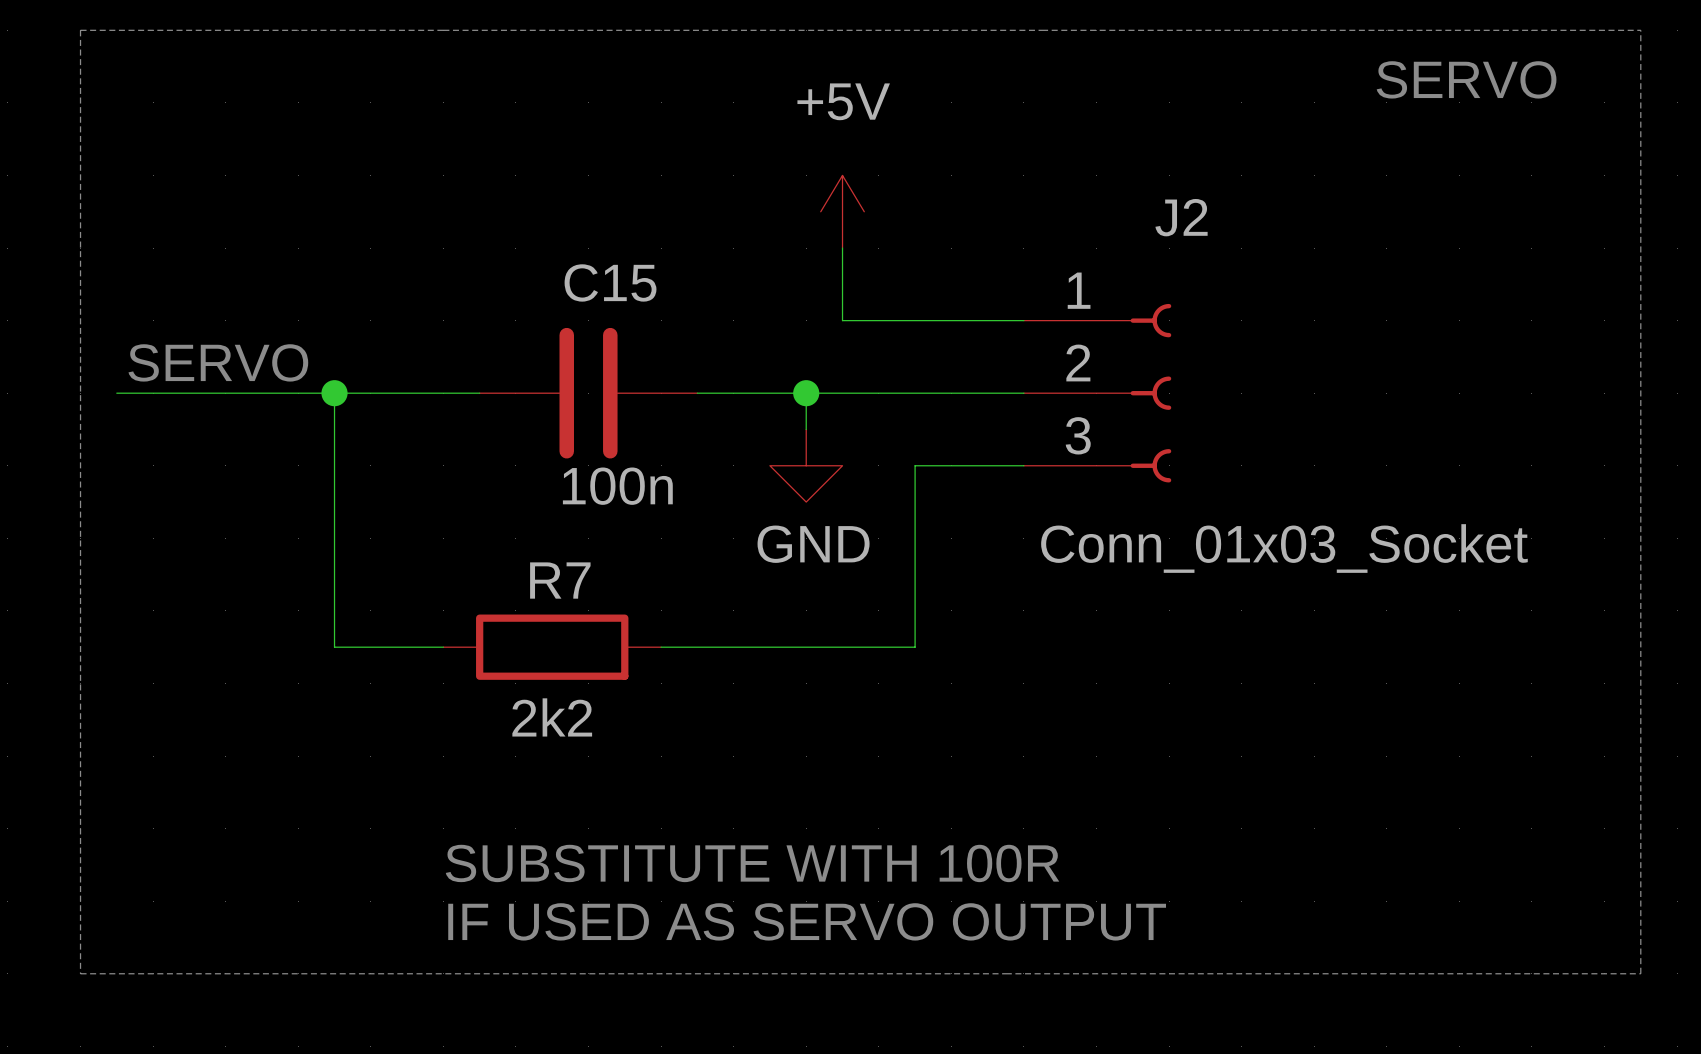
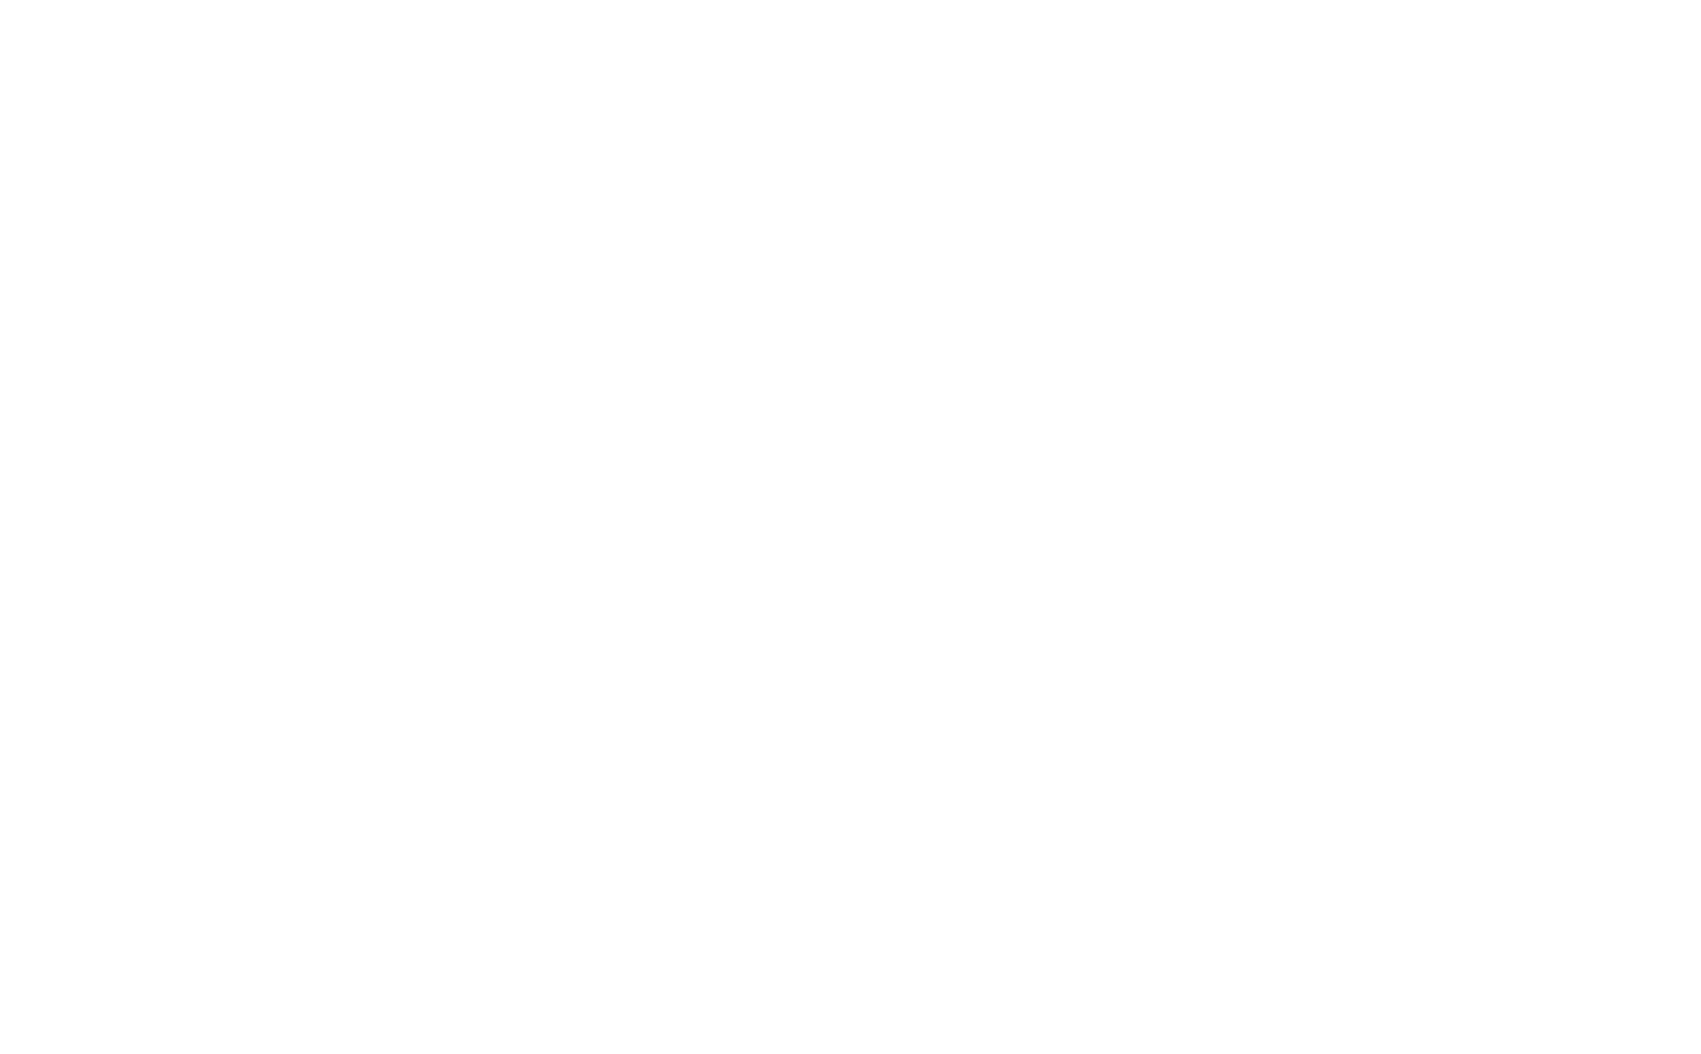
line: (80, 30) (1640, 30) (1640, 973) (80, 973) (80, 30) -> none
text: SERVO (1466, 79) -> none
power symbol: +5V (842, 211) -> none
wire: (842, 248) (842, 320) (1023, 320) -> none
text: SERVO (218, 362) -> none
wire: (116, 393) (479, 393) -> none
wire: (334, 393) (334, 647) (443, 647) -> none
junction: (334, 393) -> none
C15: 100n (588, 393) -> none
wire: (697, 393) (1023, 393) -> none
wire: (806, 393) (806, 429) -> none
junction: (806, 393) -> none
J2: Conn_01x03_Socket (1097, 393) -> none
power symbol: GND (806, 465) -> none
wire: (1023, 465) (915, 465) (915, 647) (661, 647) -> none
R7: 2k2 (552, 647) -> none
text: SUBSTITUTE WITH 100R (752, 863) -> none
text: IF USED AS SERVO OUTPUT (807, 921) -> none

